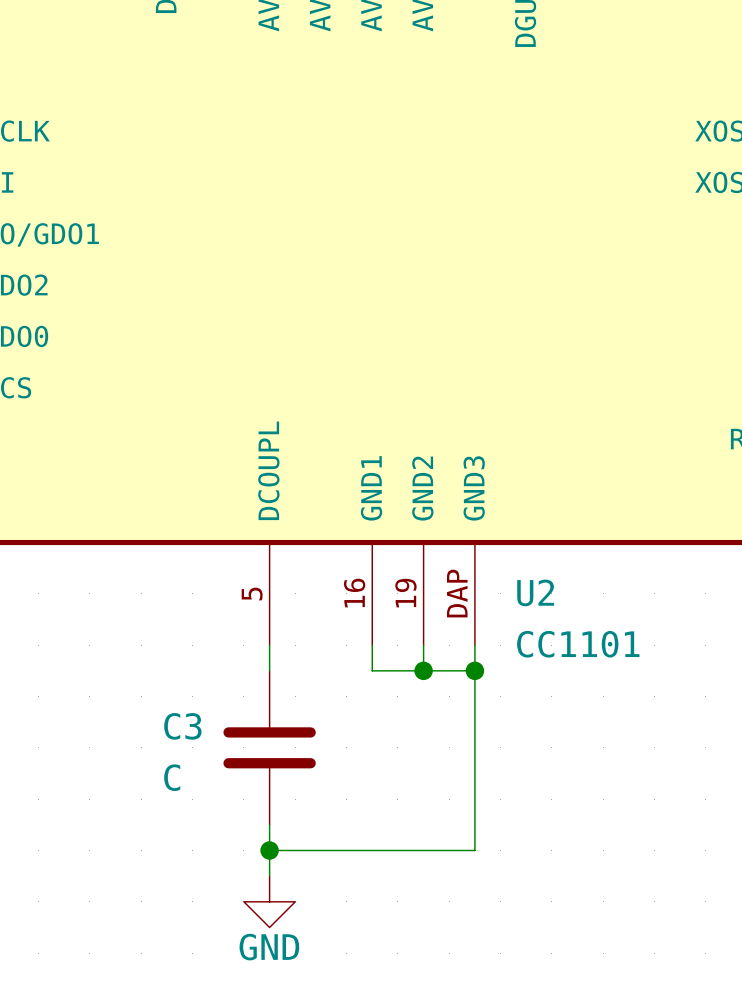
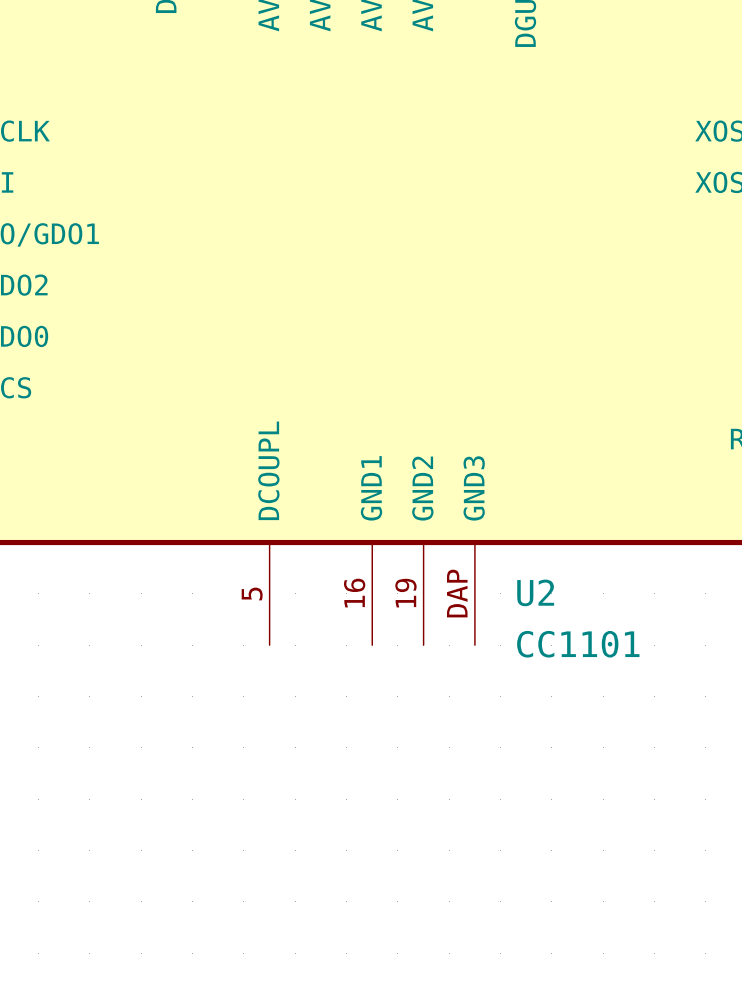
wire: (269, 645) (269, 670) -> none
wire: (372, 645) (372, 670) (474, 670) -> none
wire: (423, 645) (423, 670) -> none
wire: (474, 645) (474, 850) (269, 850) -> none
junction: (423, 670) -> none
junction: (474, 670) -> none
C3: C (269, 747) -> none
wire: (269, 824) (269, 876) -> none
junction: (269, 850) -> none
power symbol: GND (269, 901) -> none

